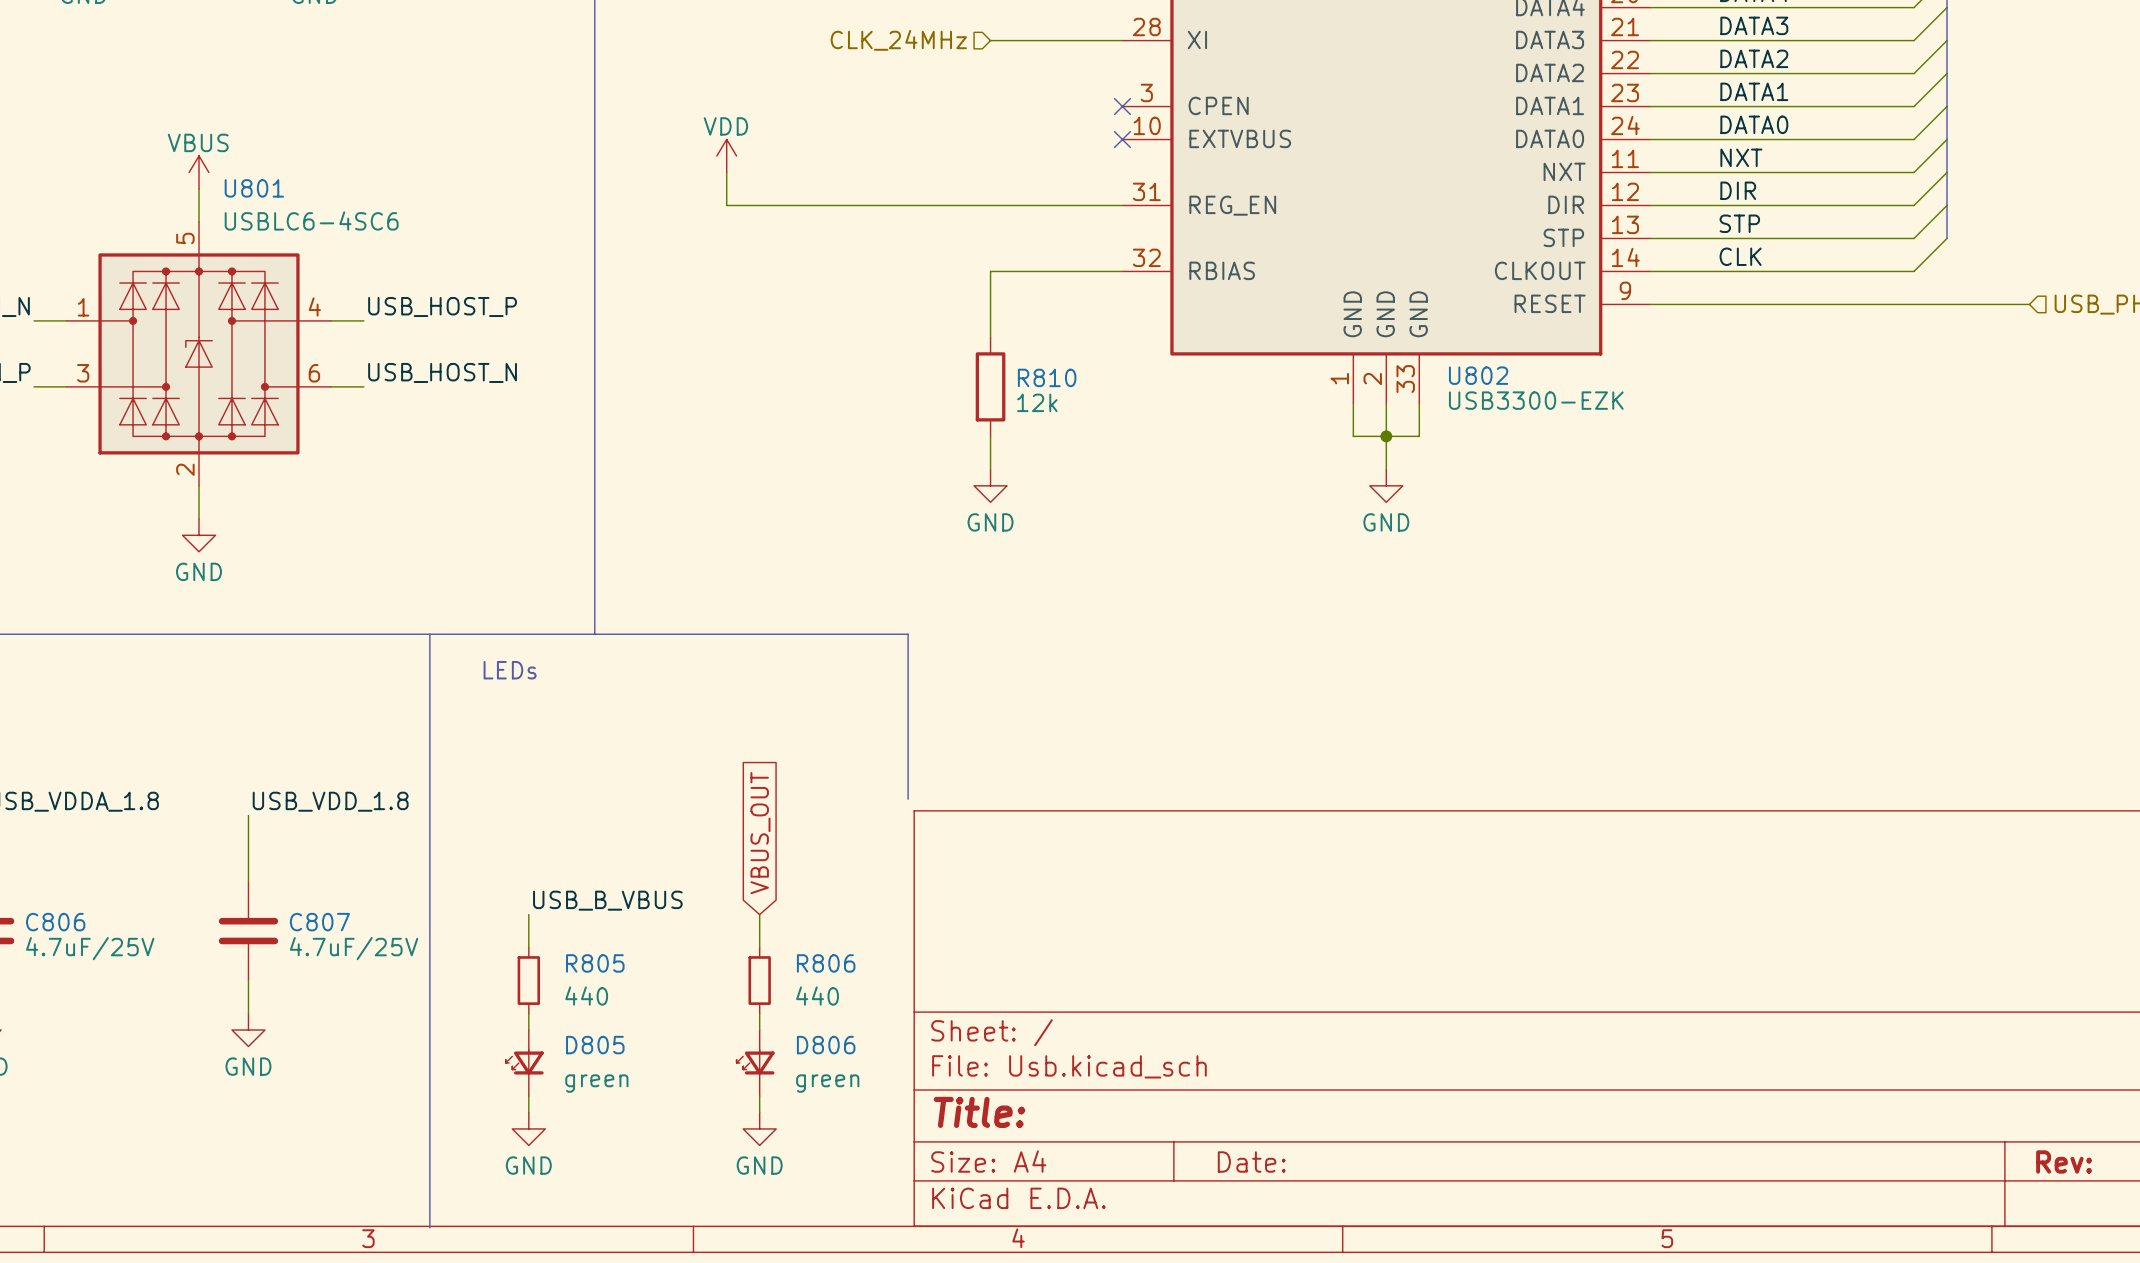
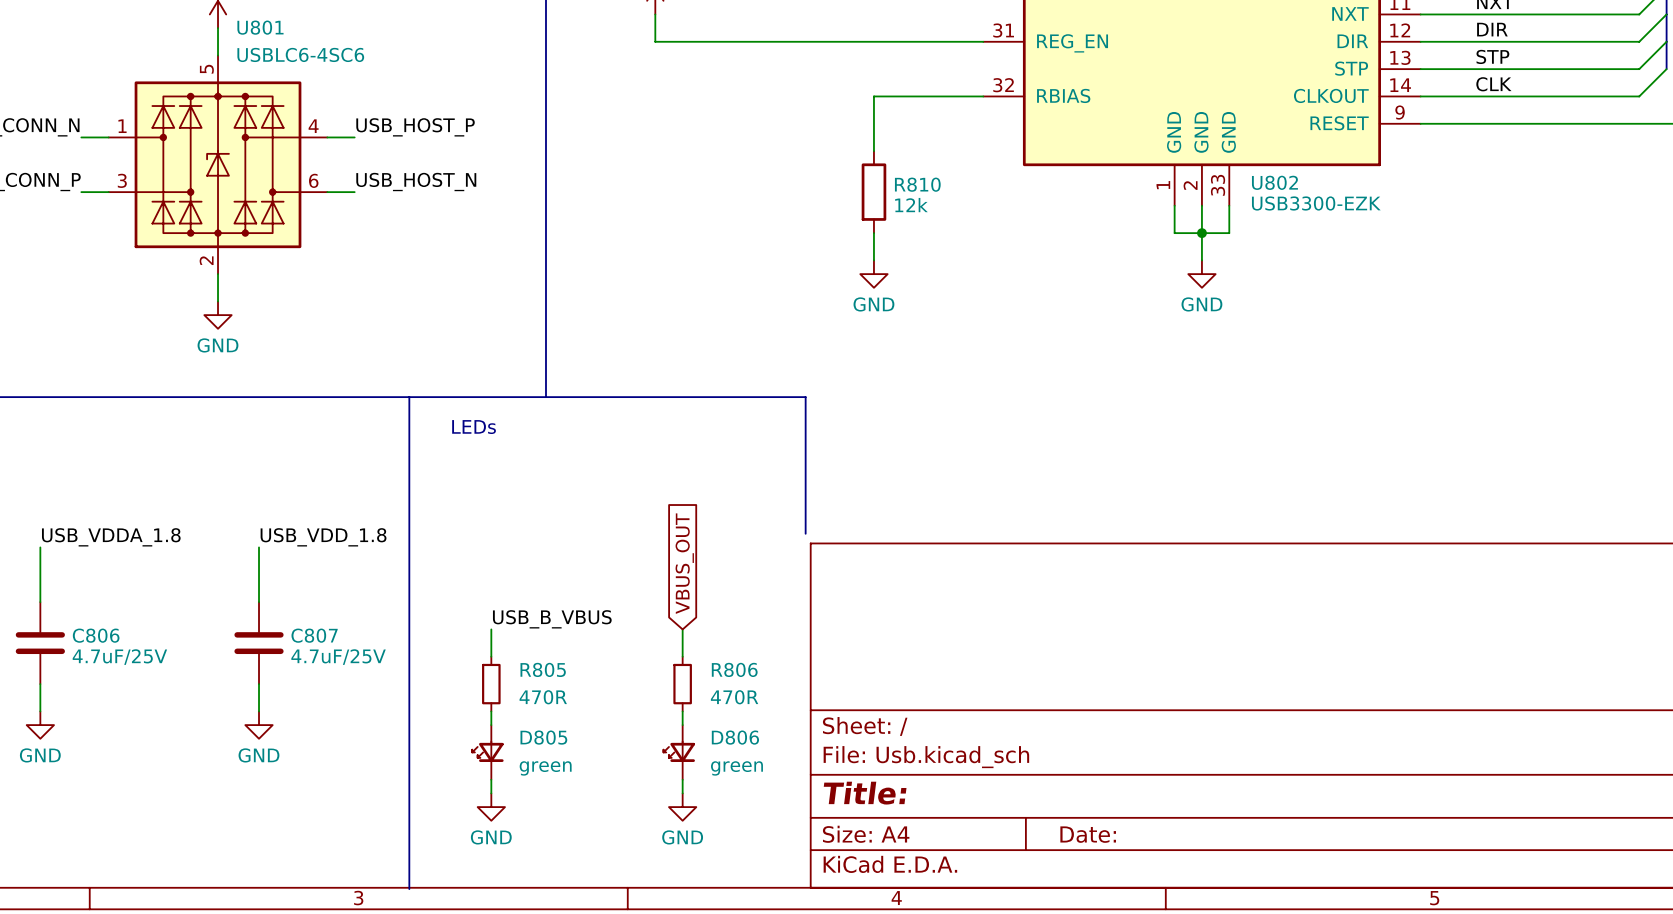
R805 value: 440 (586, 996) -> 470R (543, 697)
R806 value: 440 (817, 996) -> 470R (734, 697)

